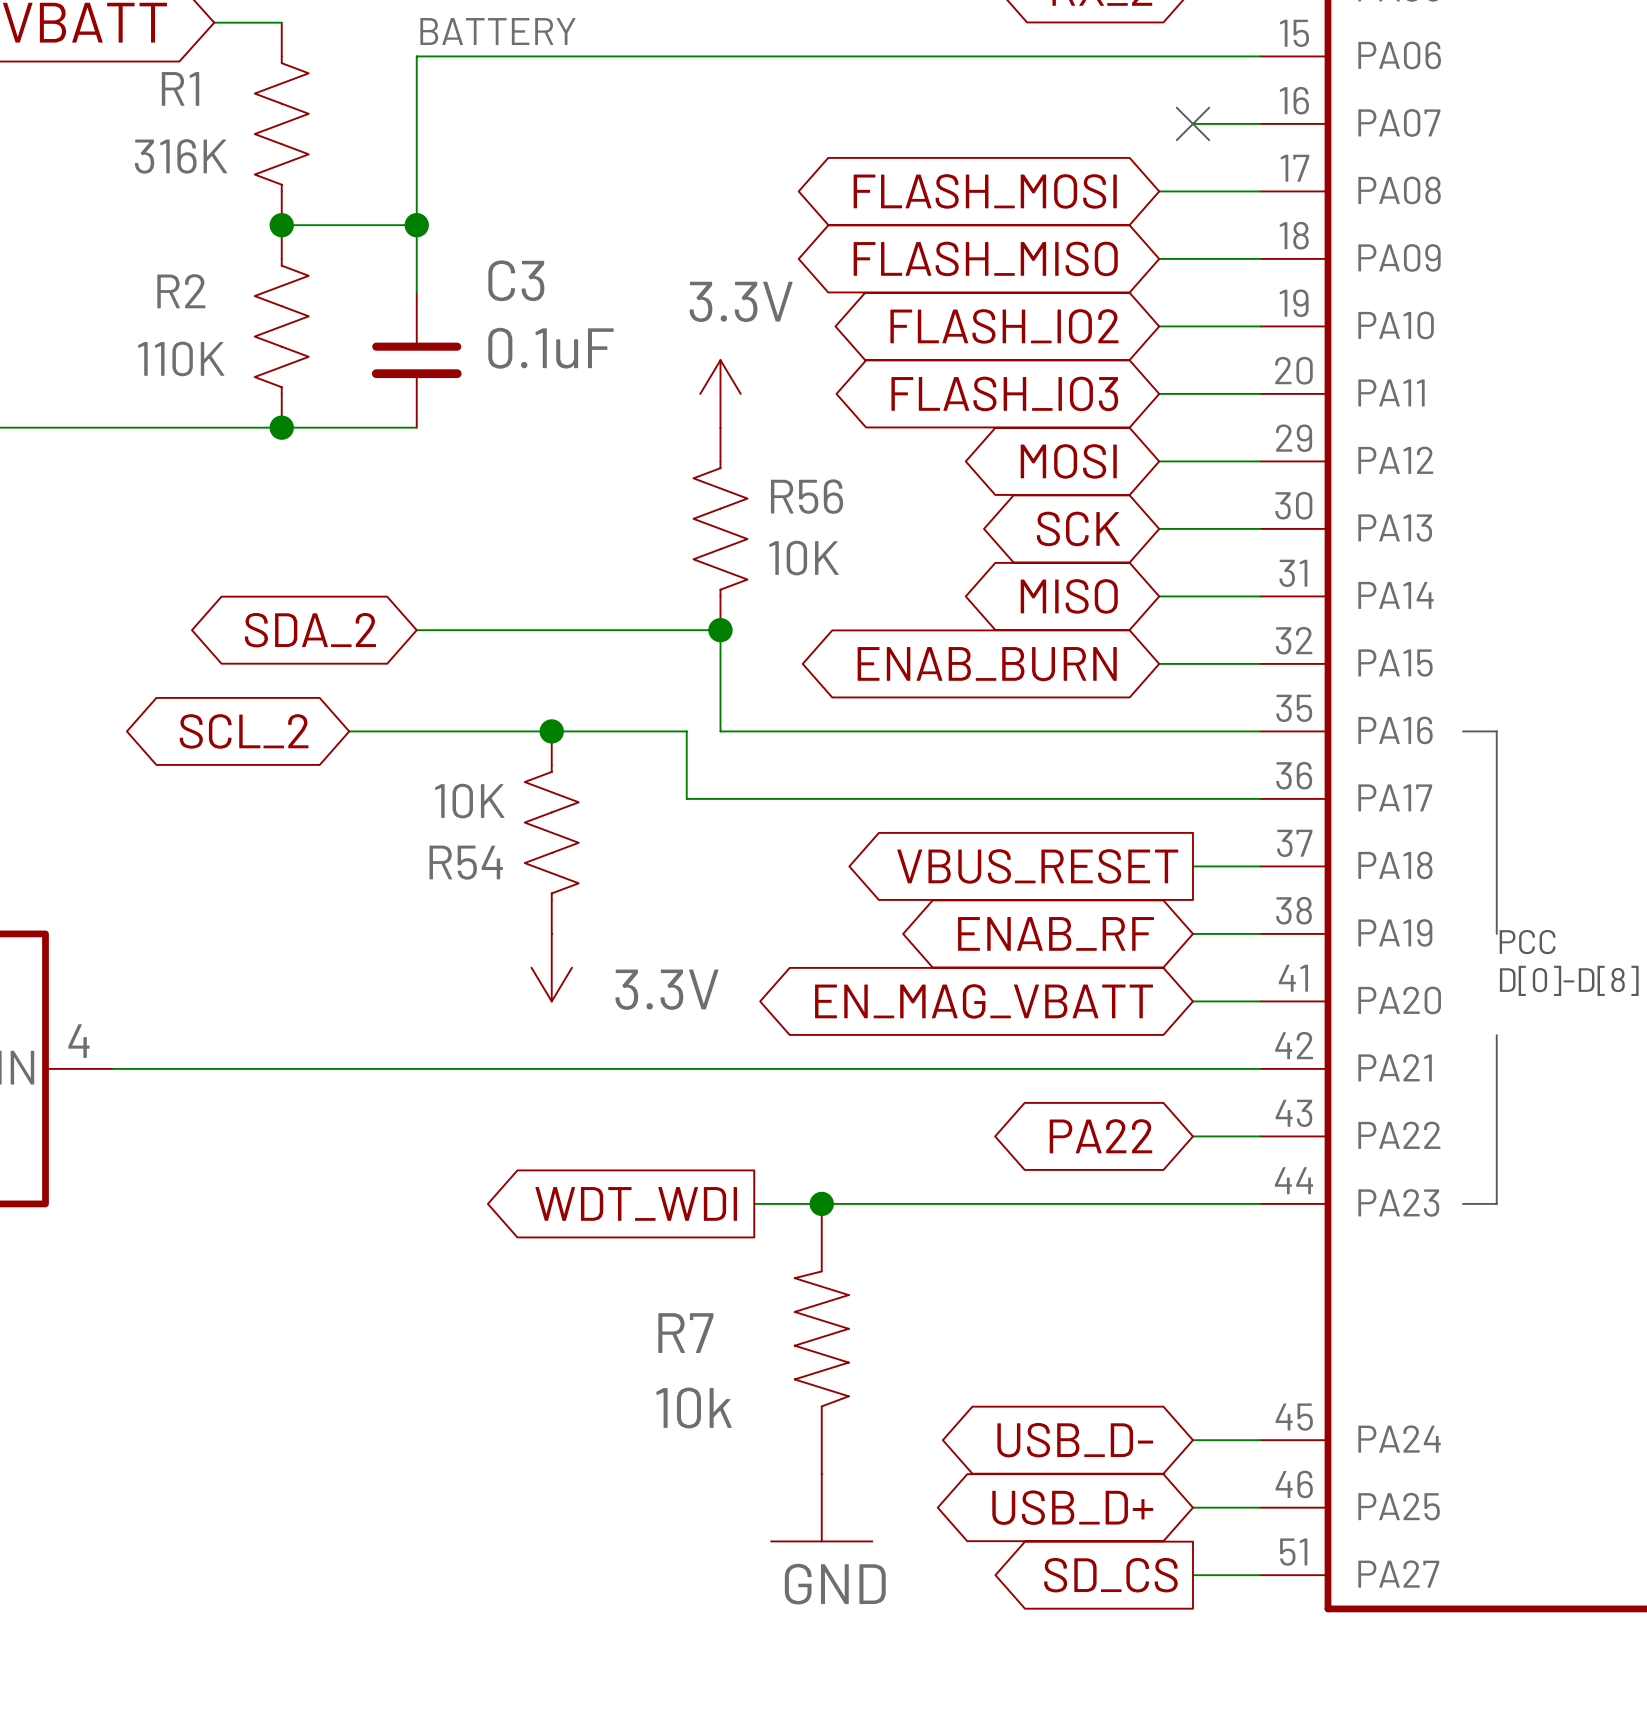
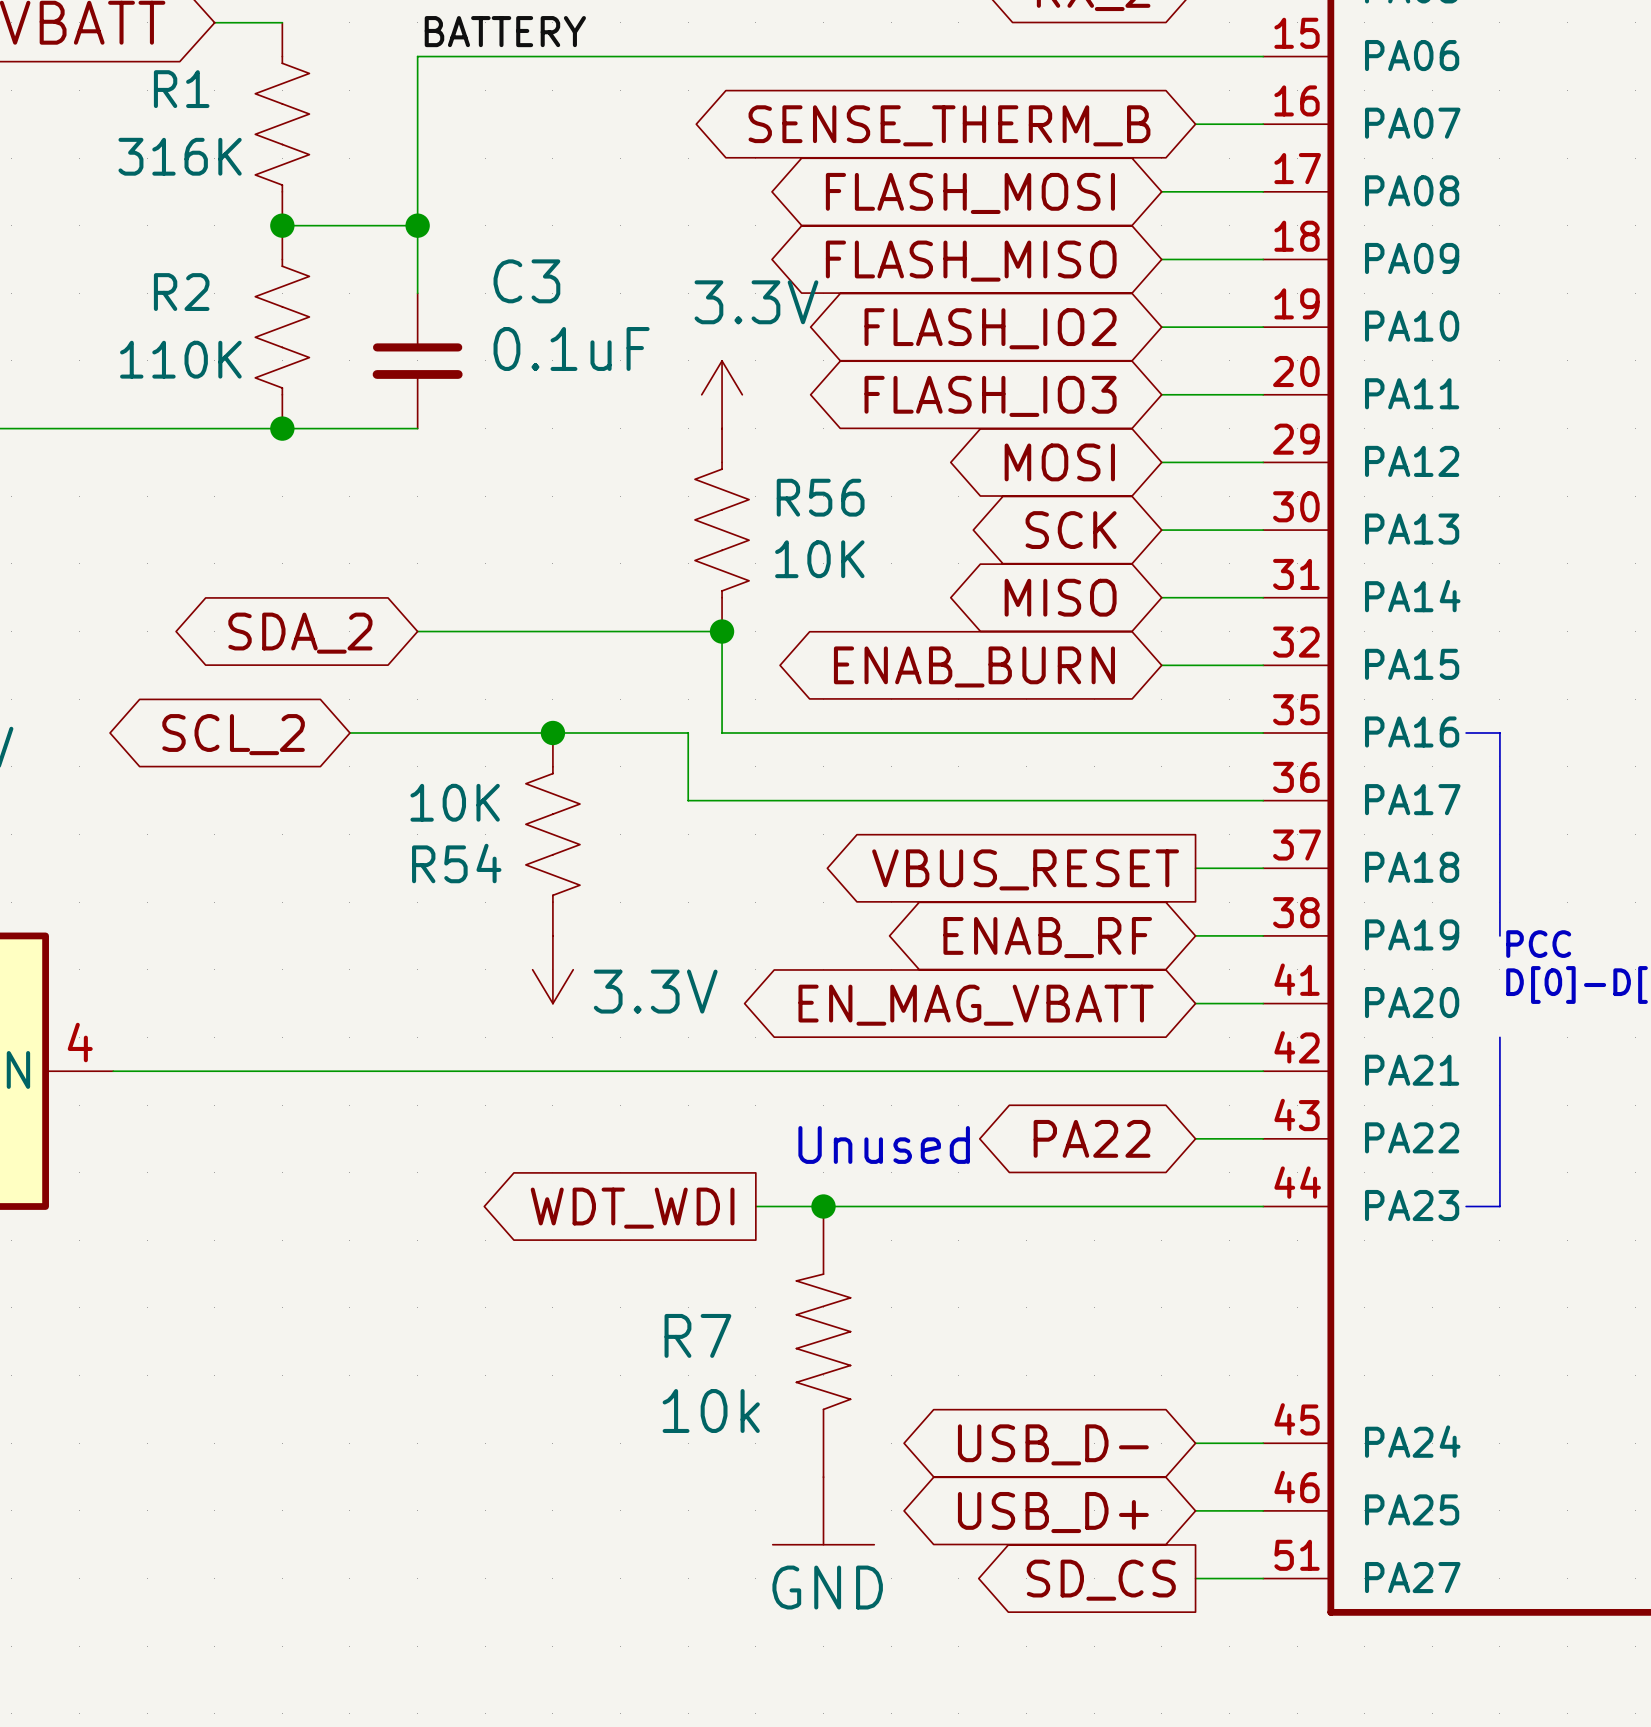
global label: none -> SENSE_THERM_B (949, 125)
no-connect mark: (1192, 123) -> none
text: none -> Unused (884, 1144)

